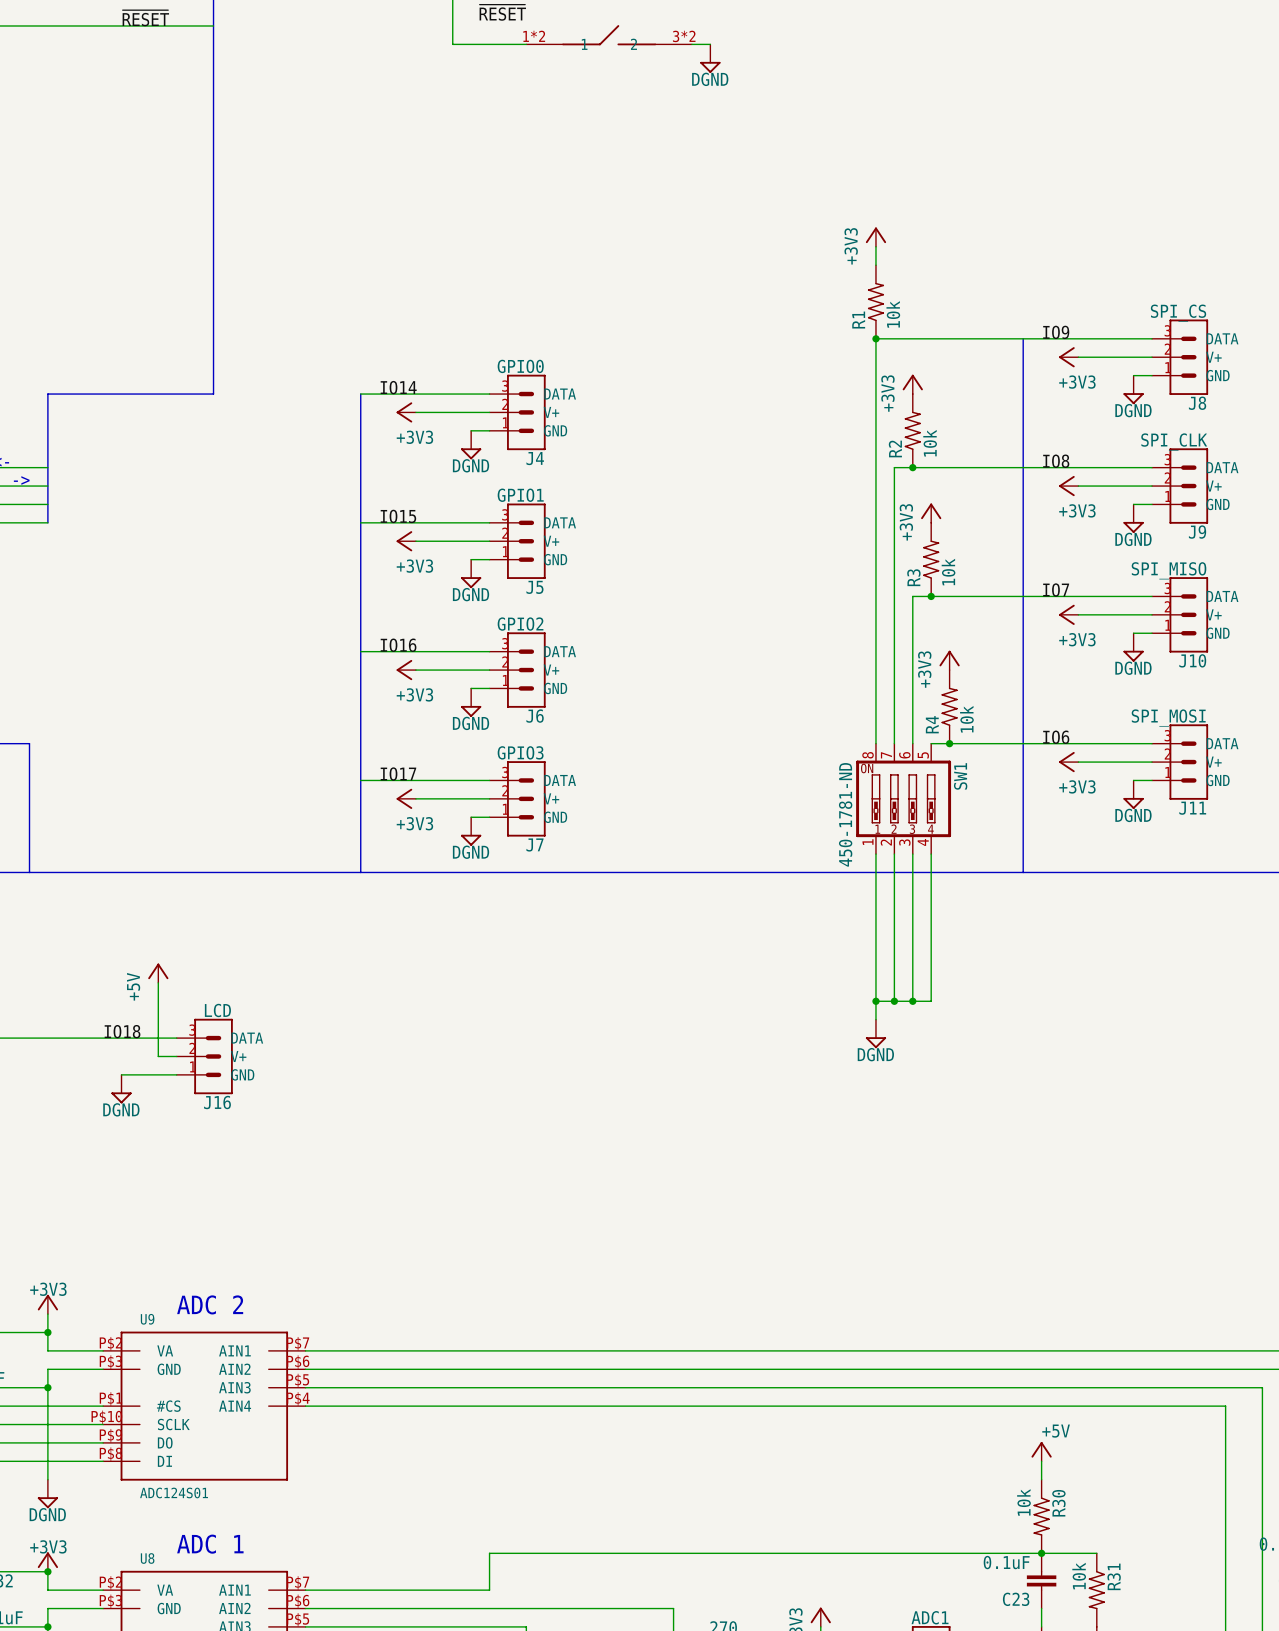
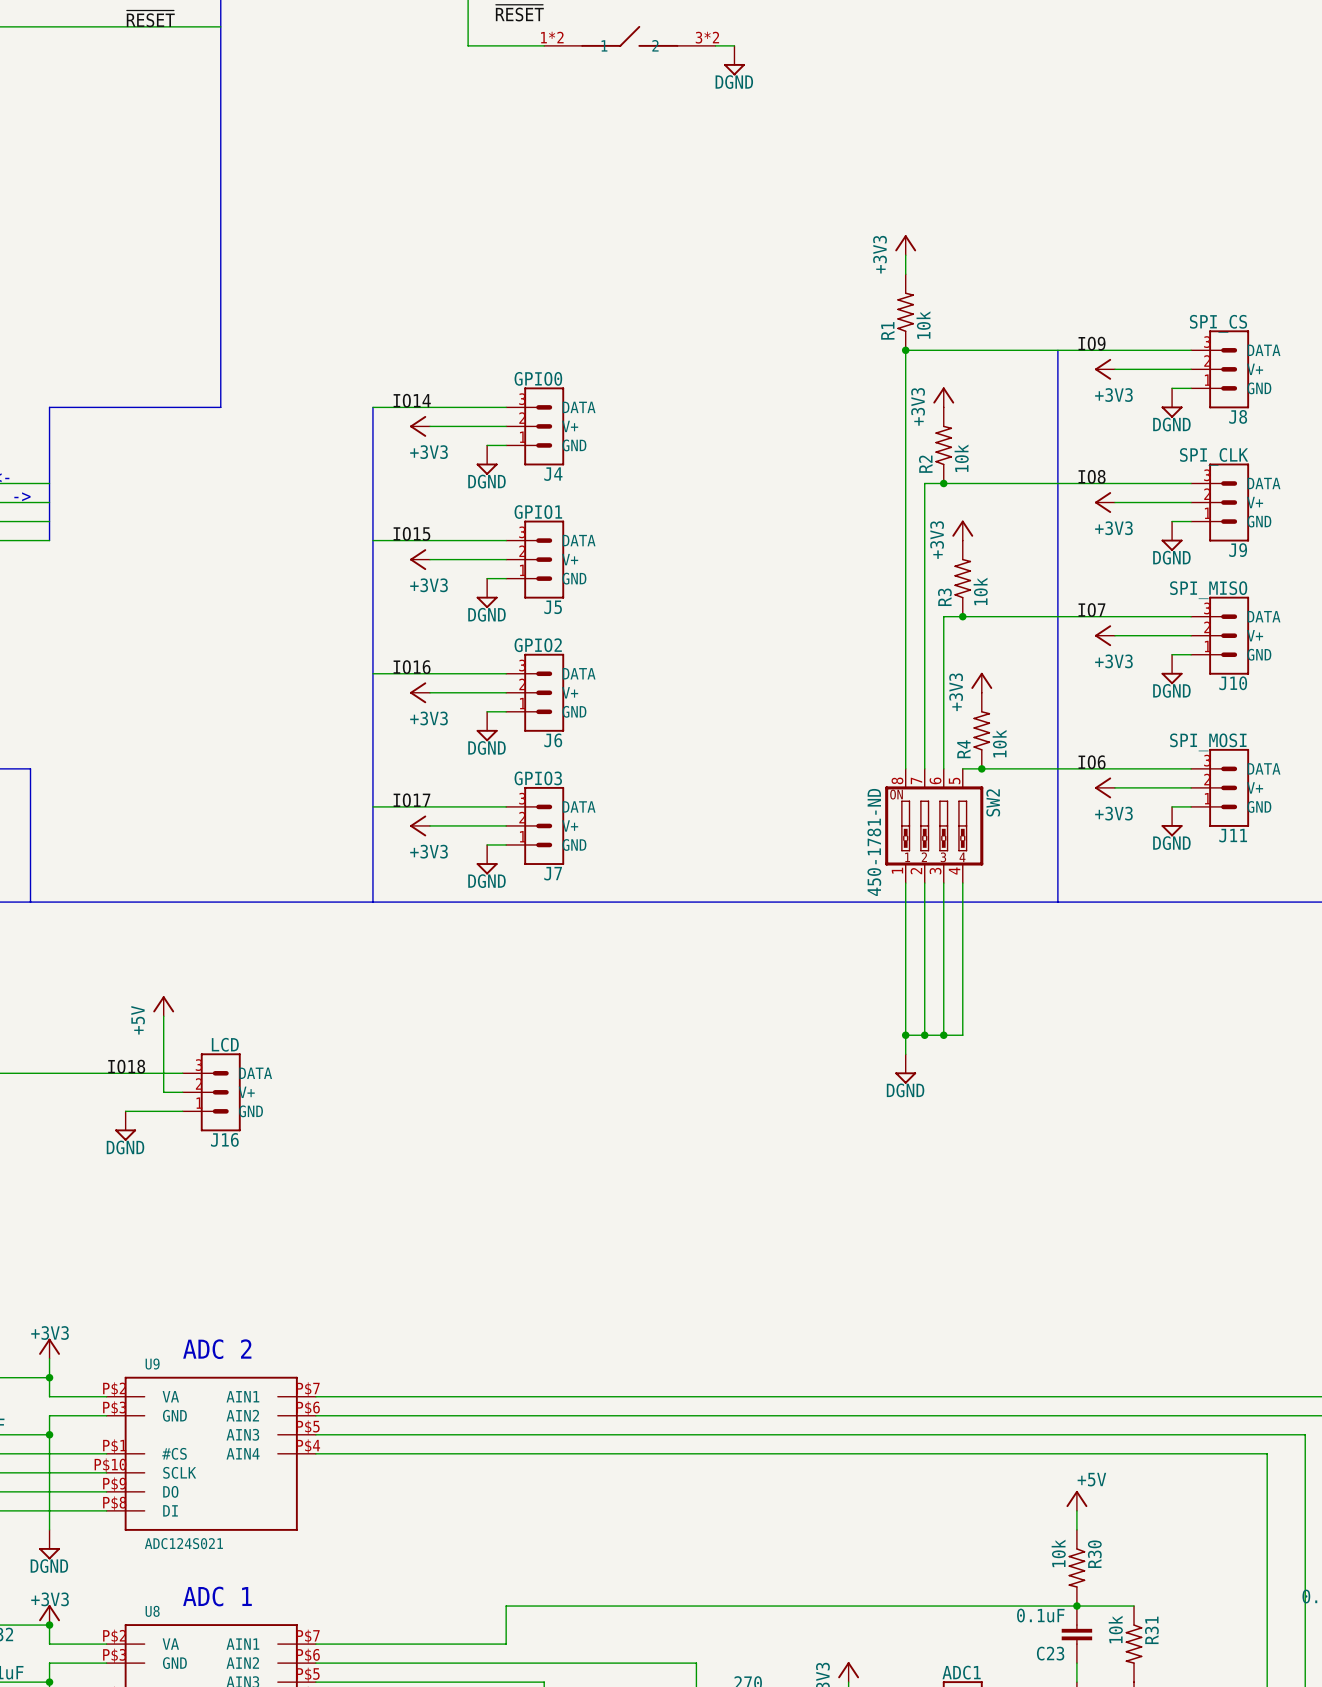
SW1 name: SW1 (960, 776) -> SW2 (993, 802)
U9 value: ADC124S01 (174, 1492) -> ADC124S021 (183, 1543)

